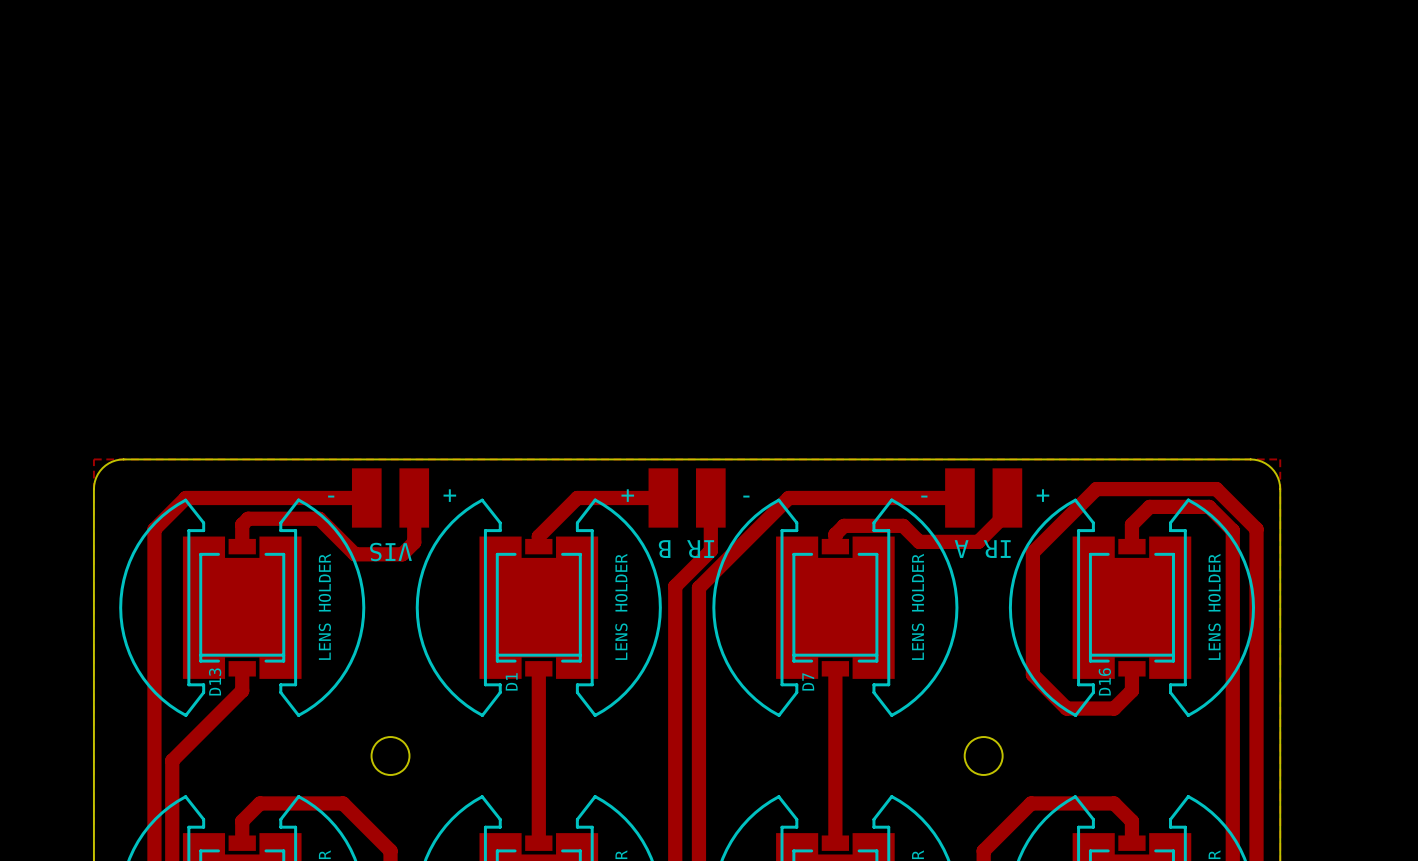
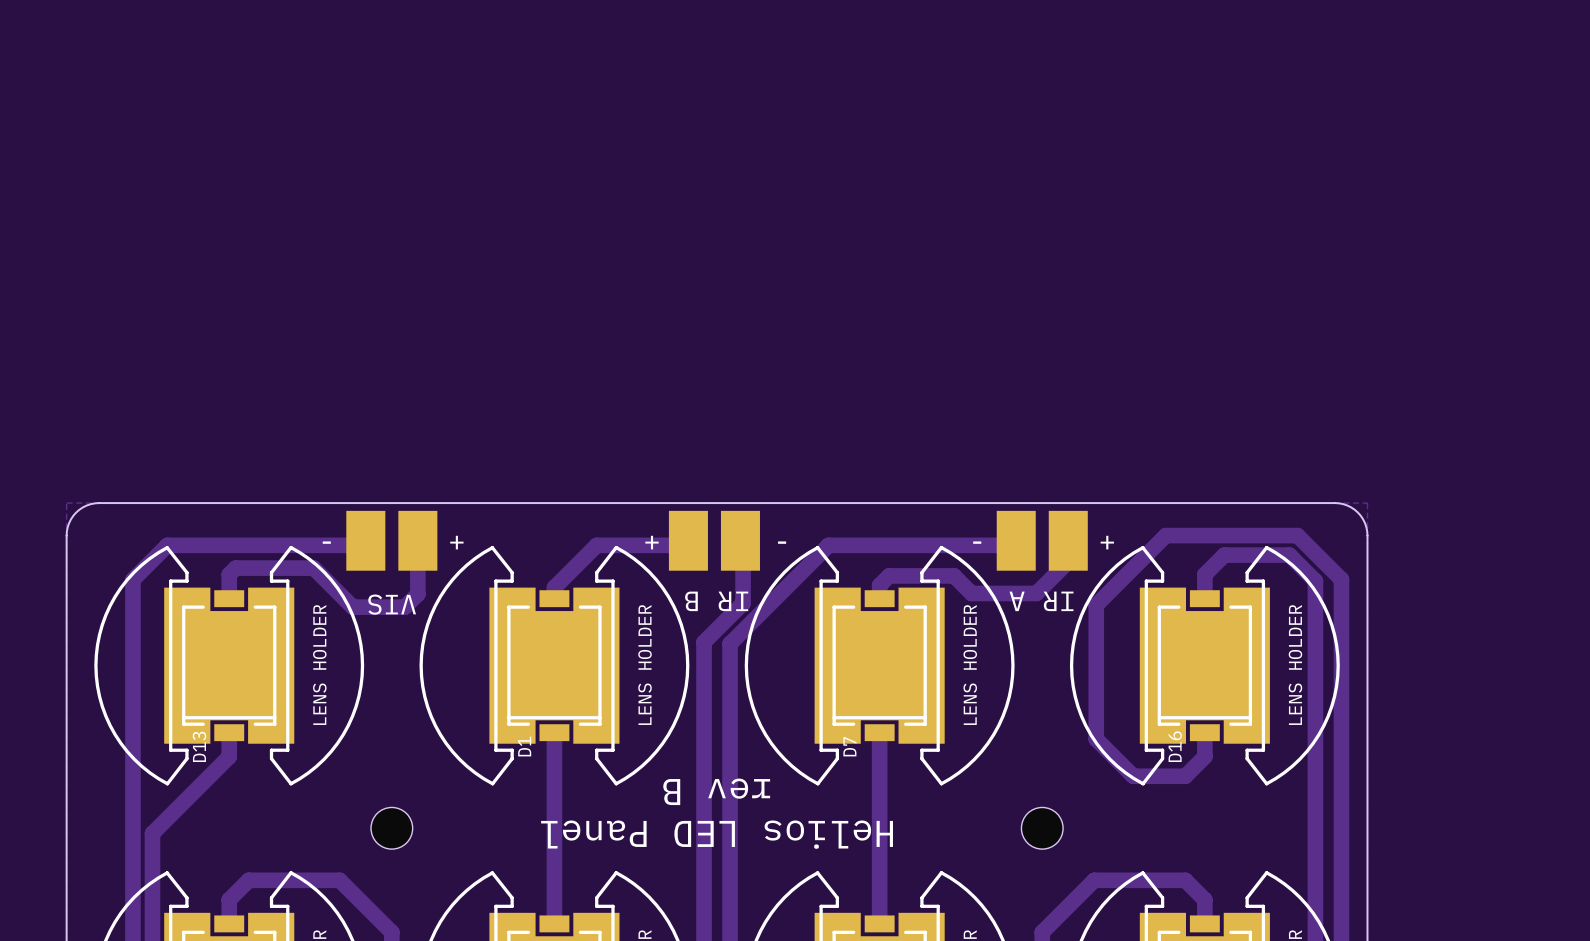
part: none -> (391, 540)
part: none -> (714, 540)
part: none -> (1042, 540)
part: (366, 497) -> none
part: (414, 497) -> none
part: (663, 497) -> none
part: (710, 497) -> none
part: (959, 497) -> none
part: (1007, 497) -> none
text: none -> rev B (716, 791)
text: none -> Helios LED Panel (717, 834)

